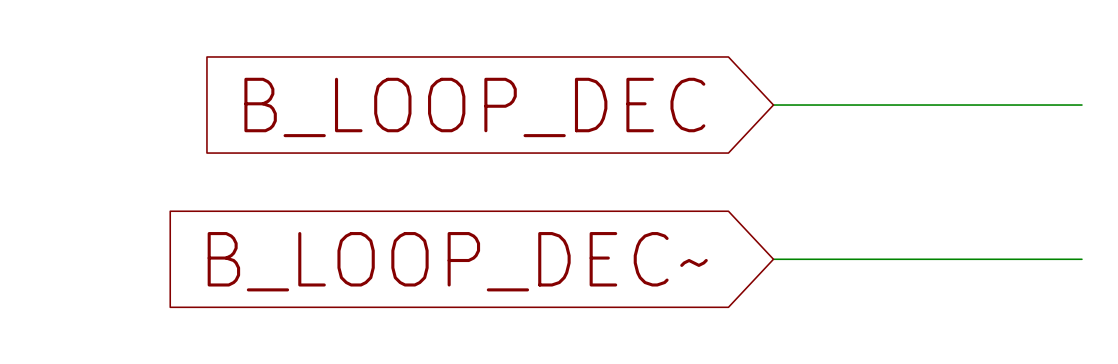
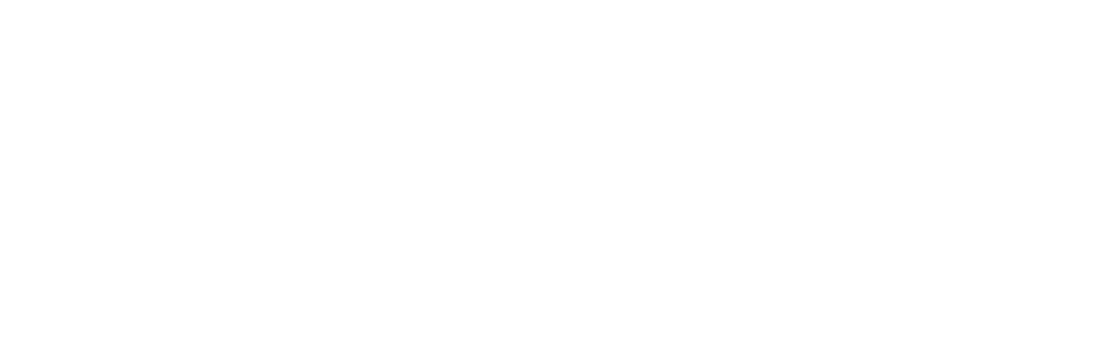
wire: (773, 105) (1081, 105) -> none
global label: B_LOOP_DEC (474, 107) -> none
wire: (773, 259) (1081, 259) -> none
global label: B_LOOP_DEC~ (457, 261) -> none

